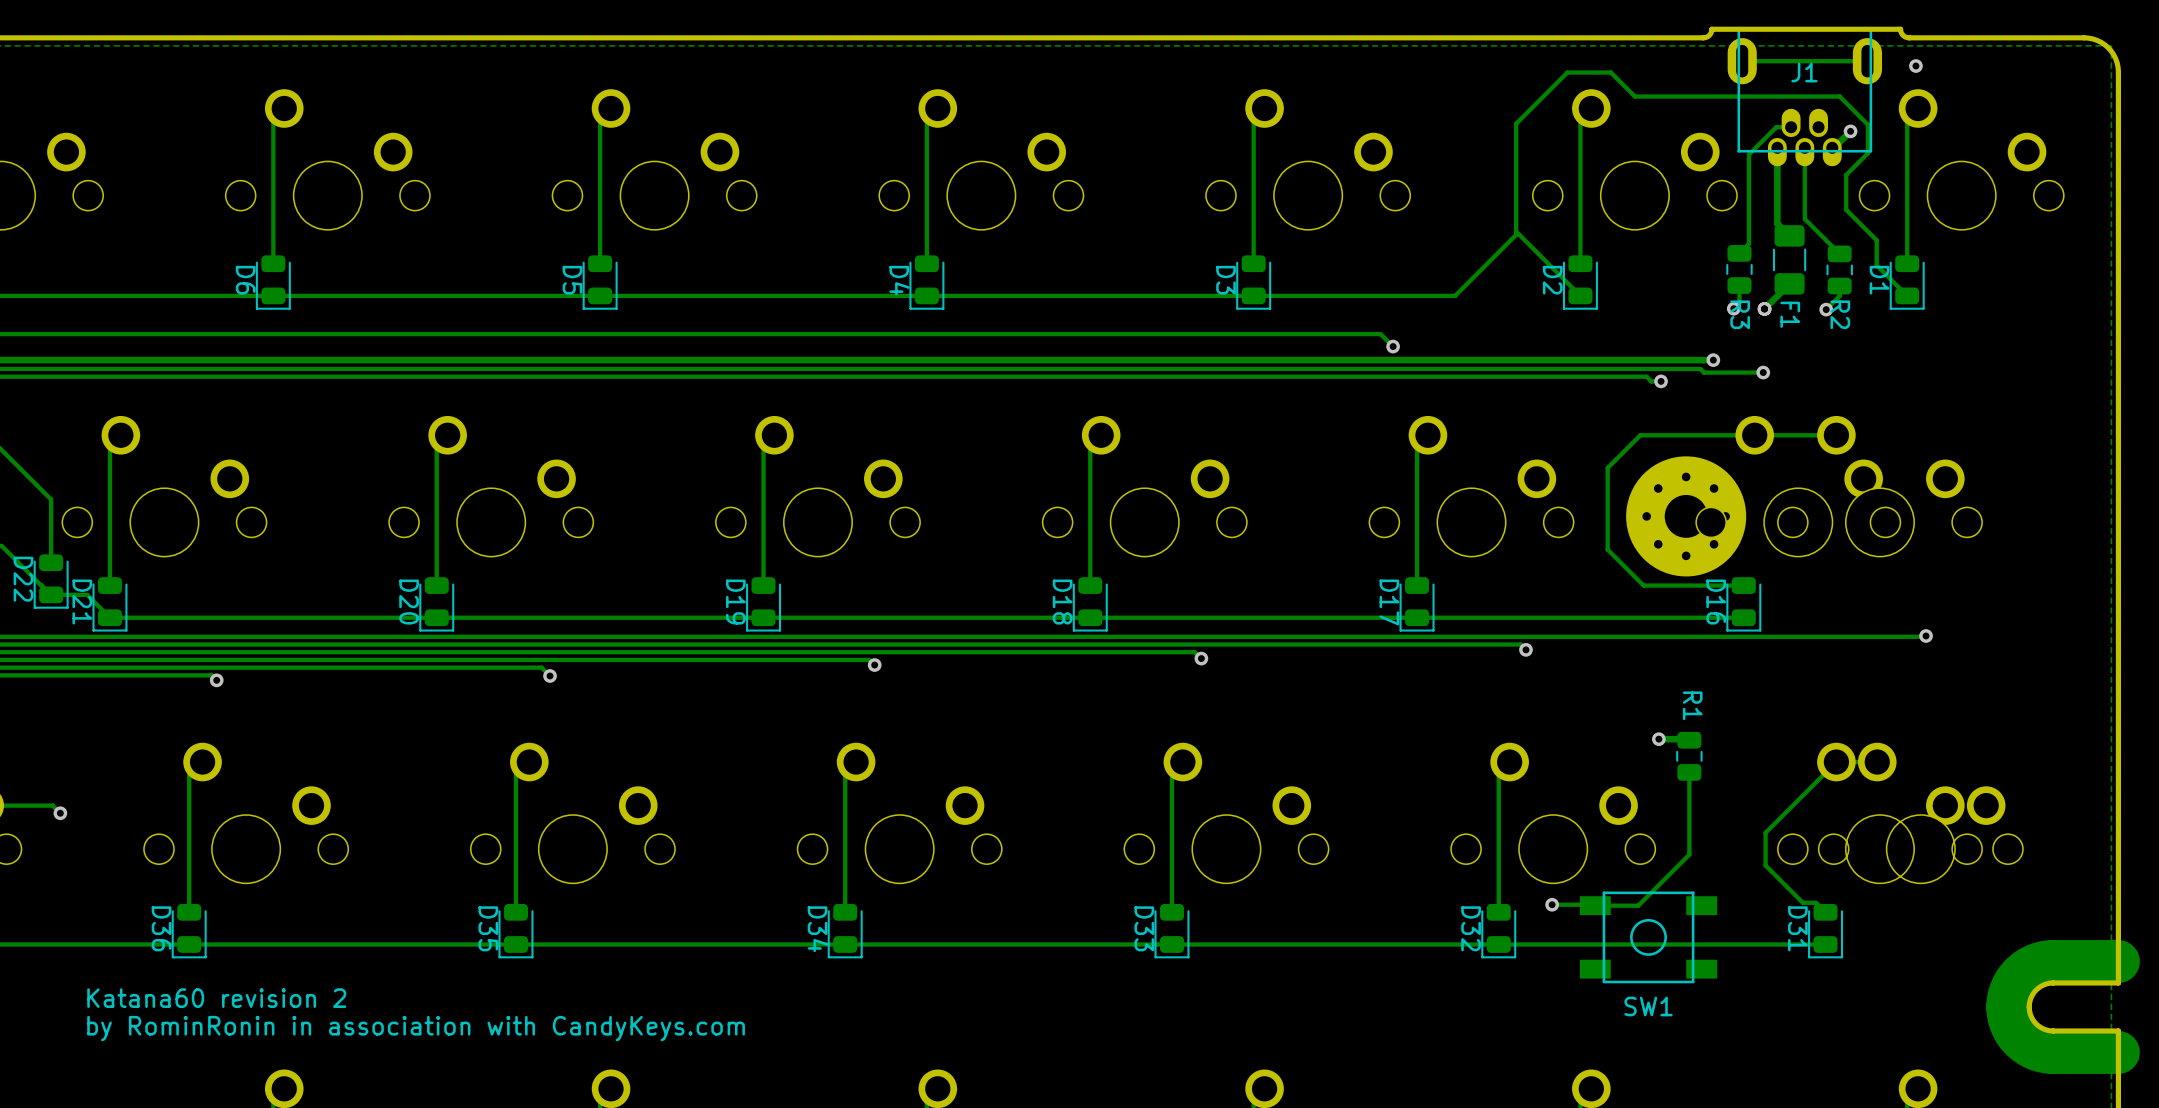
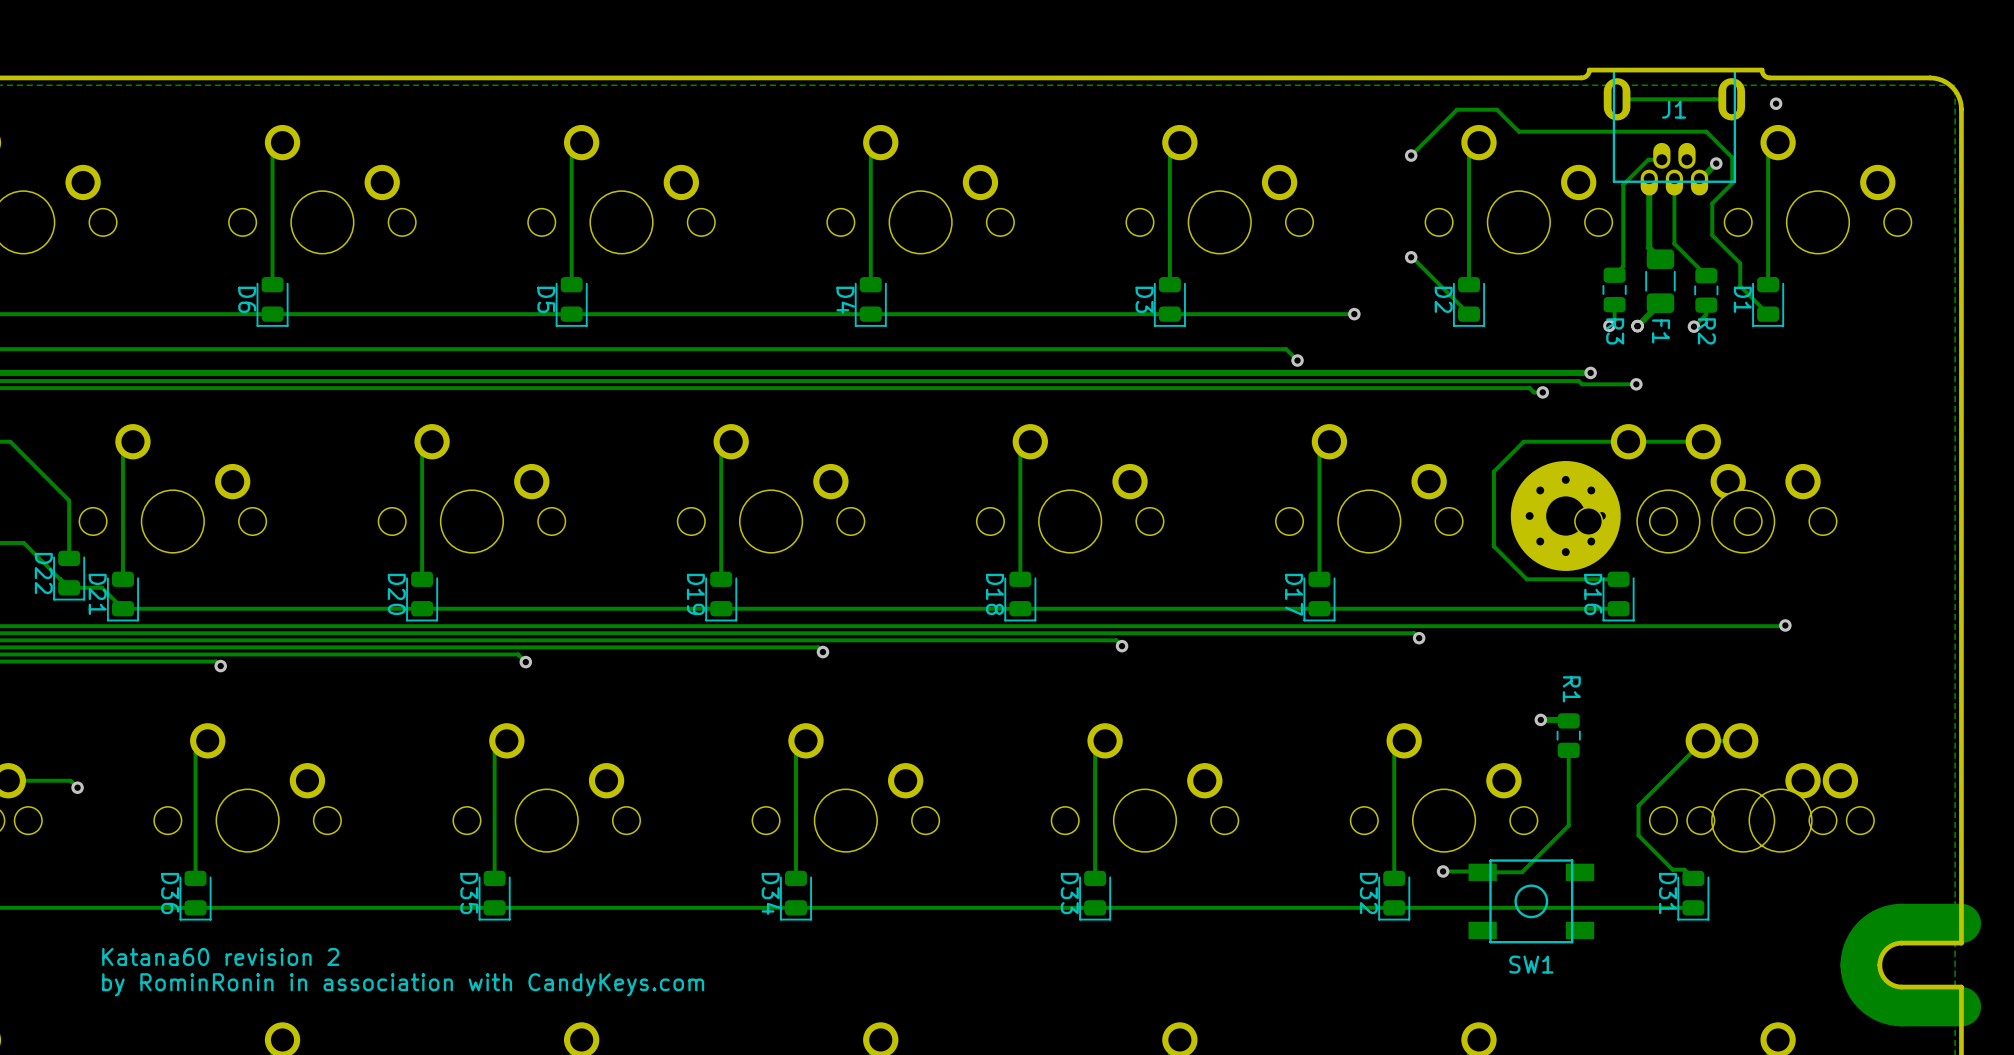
track: (1517, 122) (1516, 234) -> none
via: none -> (1411, 155)
track: (1517, 233) (1455, 295) -> none
via: none -> (1411, 257)
via: none -> (1354, 314)

